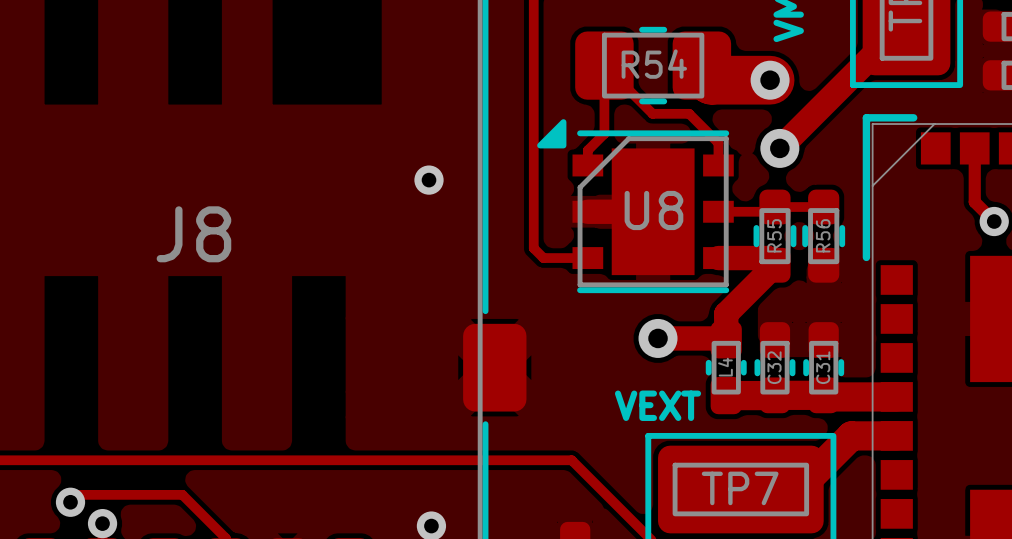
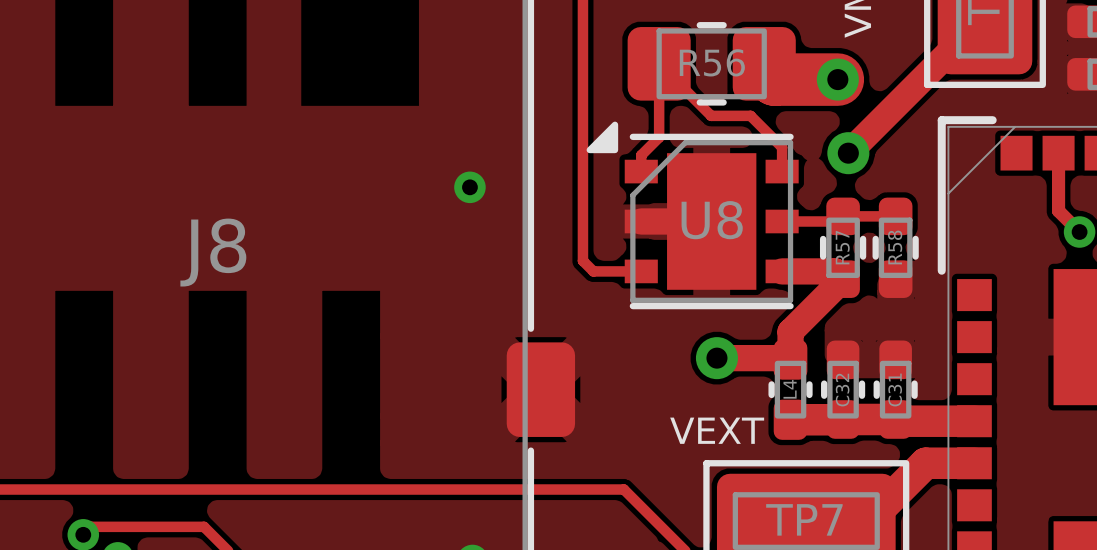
R54 name: R54 (654, 64) -> R56 (712, 62)
R55 name: R55 (774, 235) -> R57 (842, 247)
R56 name: R56 (823, 235) -> R58 (895, 247)

